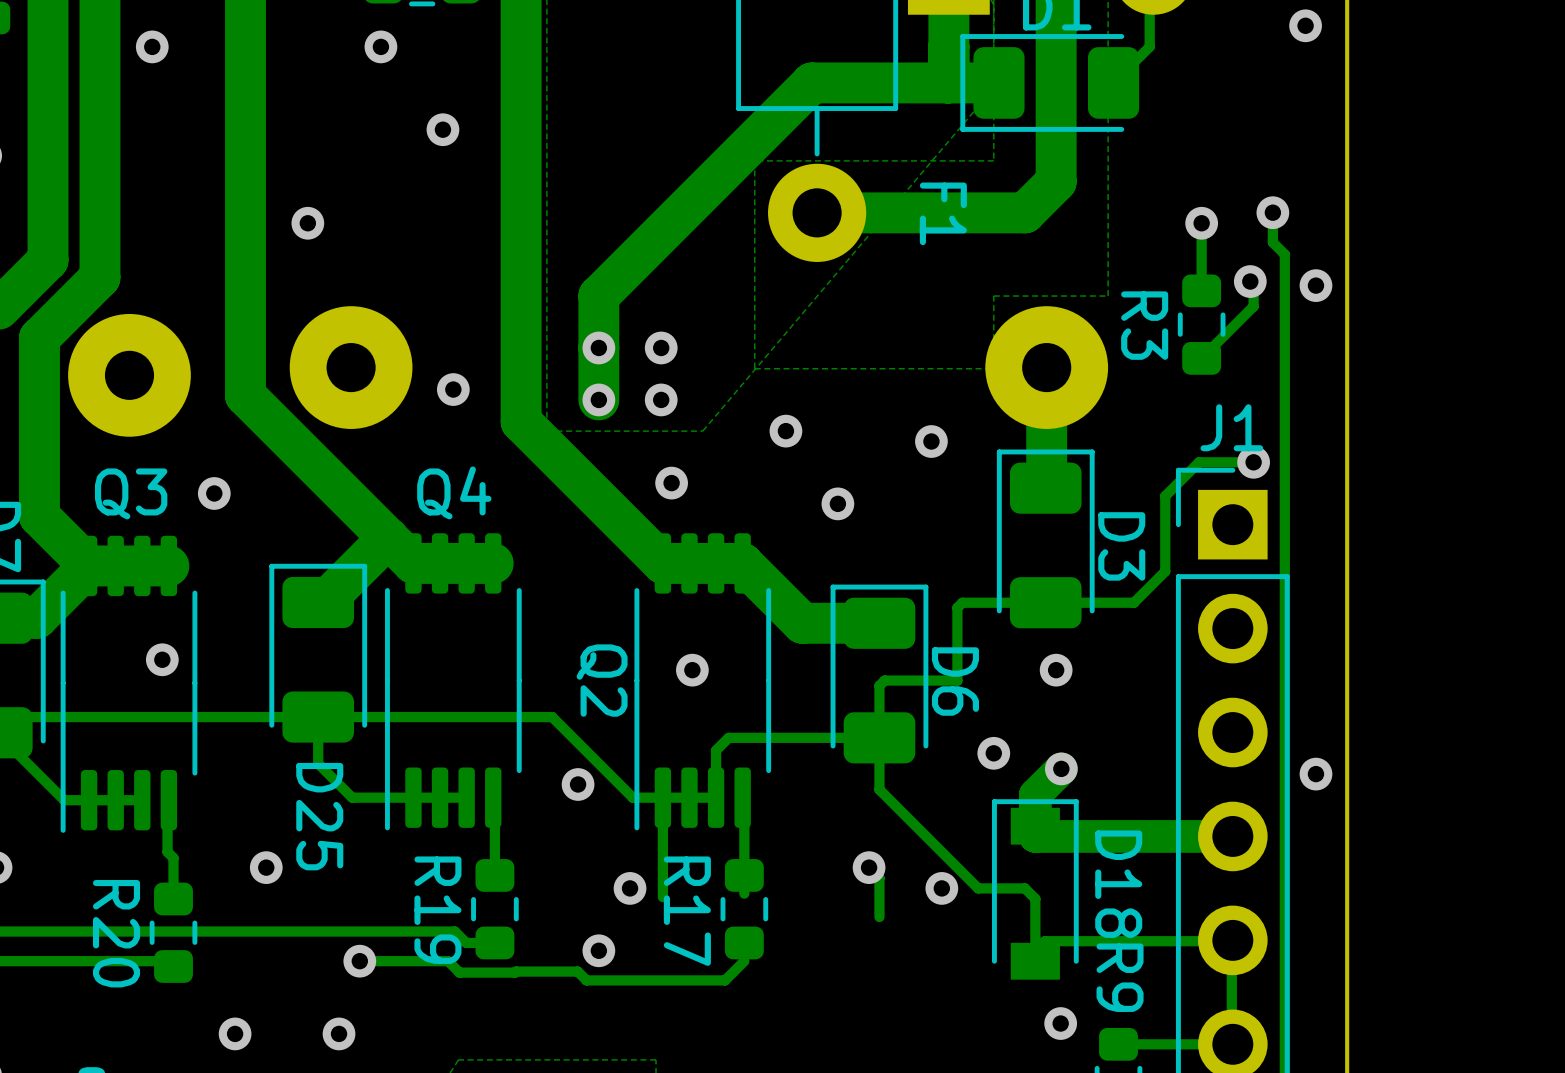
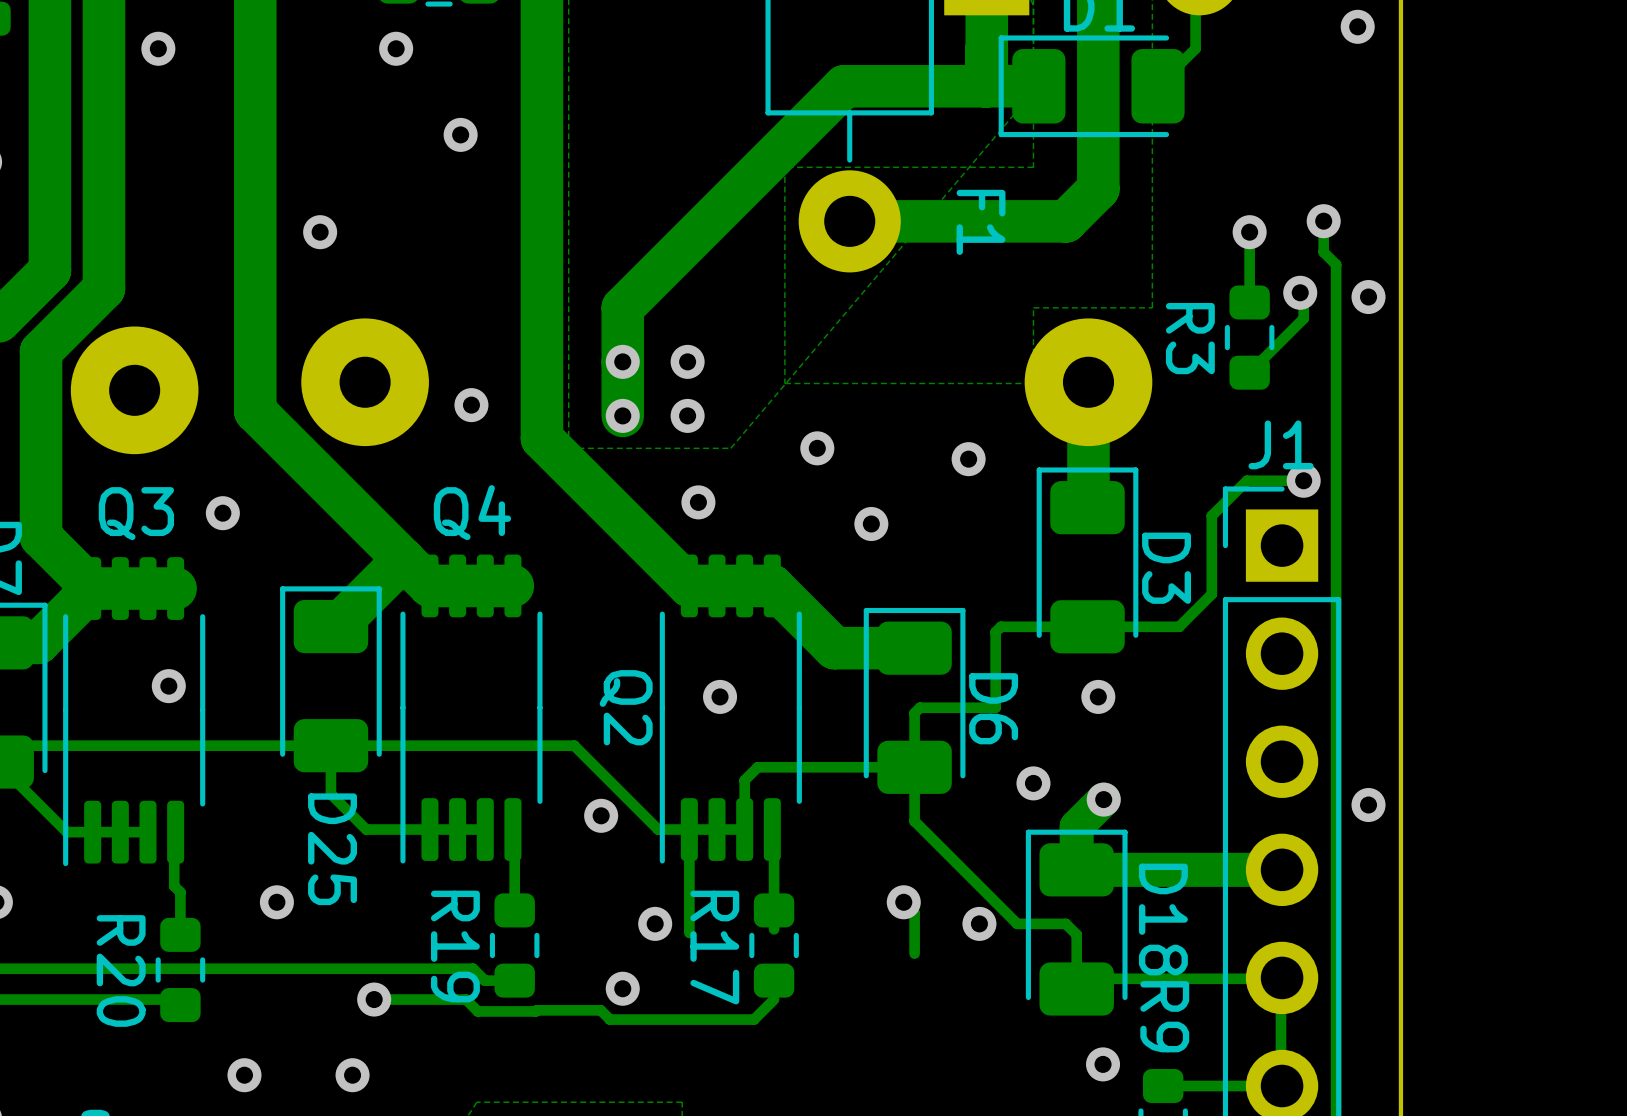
D18 footprint: [991, 799, 1079, 980] -> [1025, 829, 1128, 1016]

